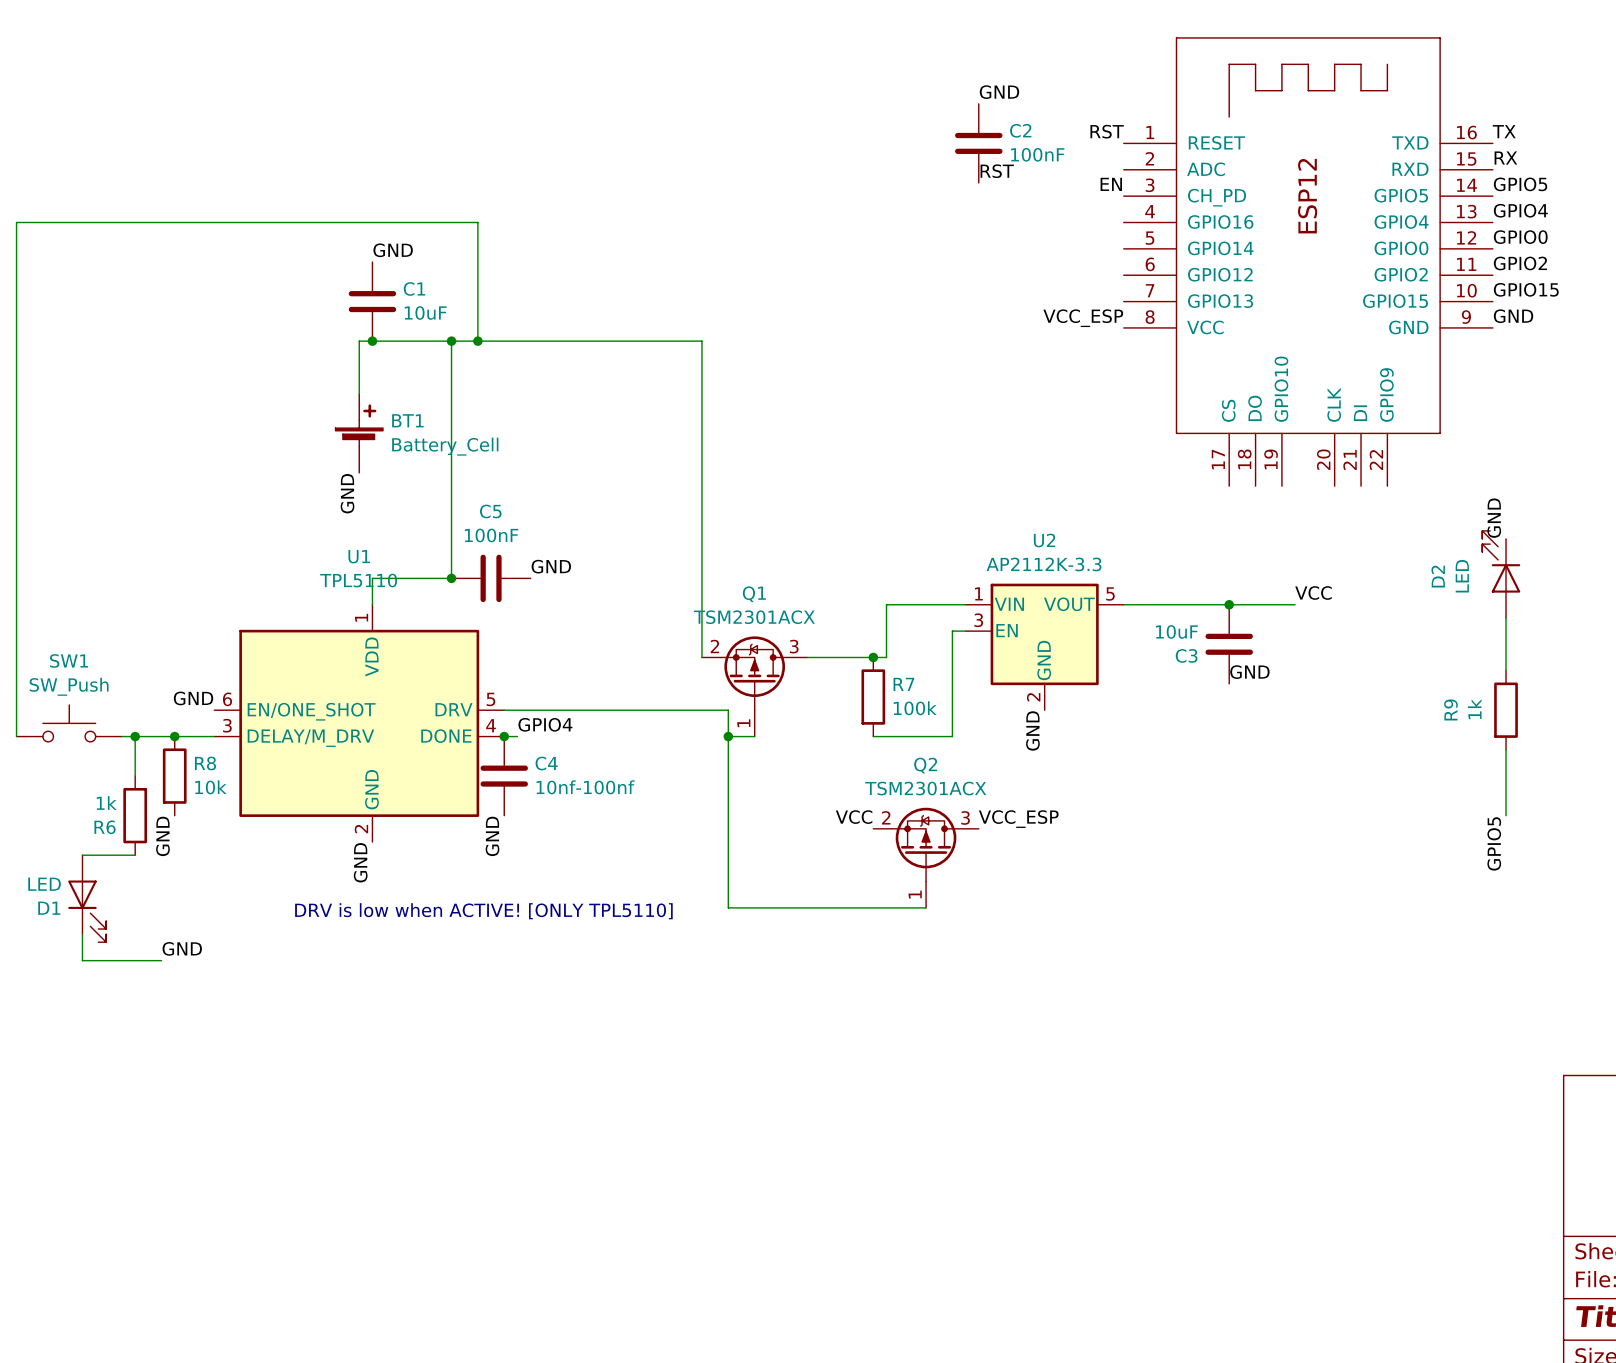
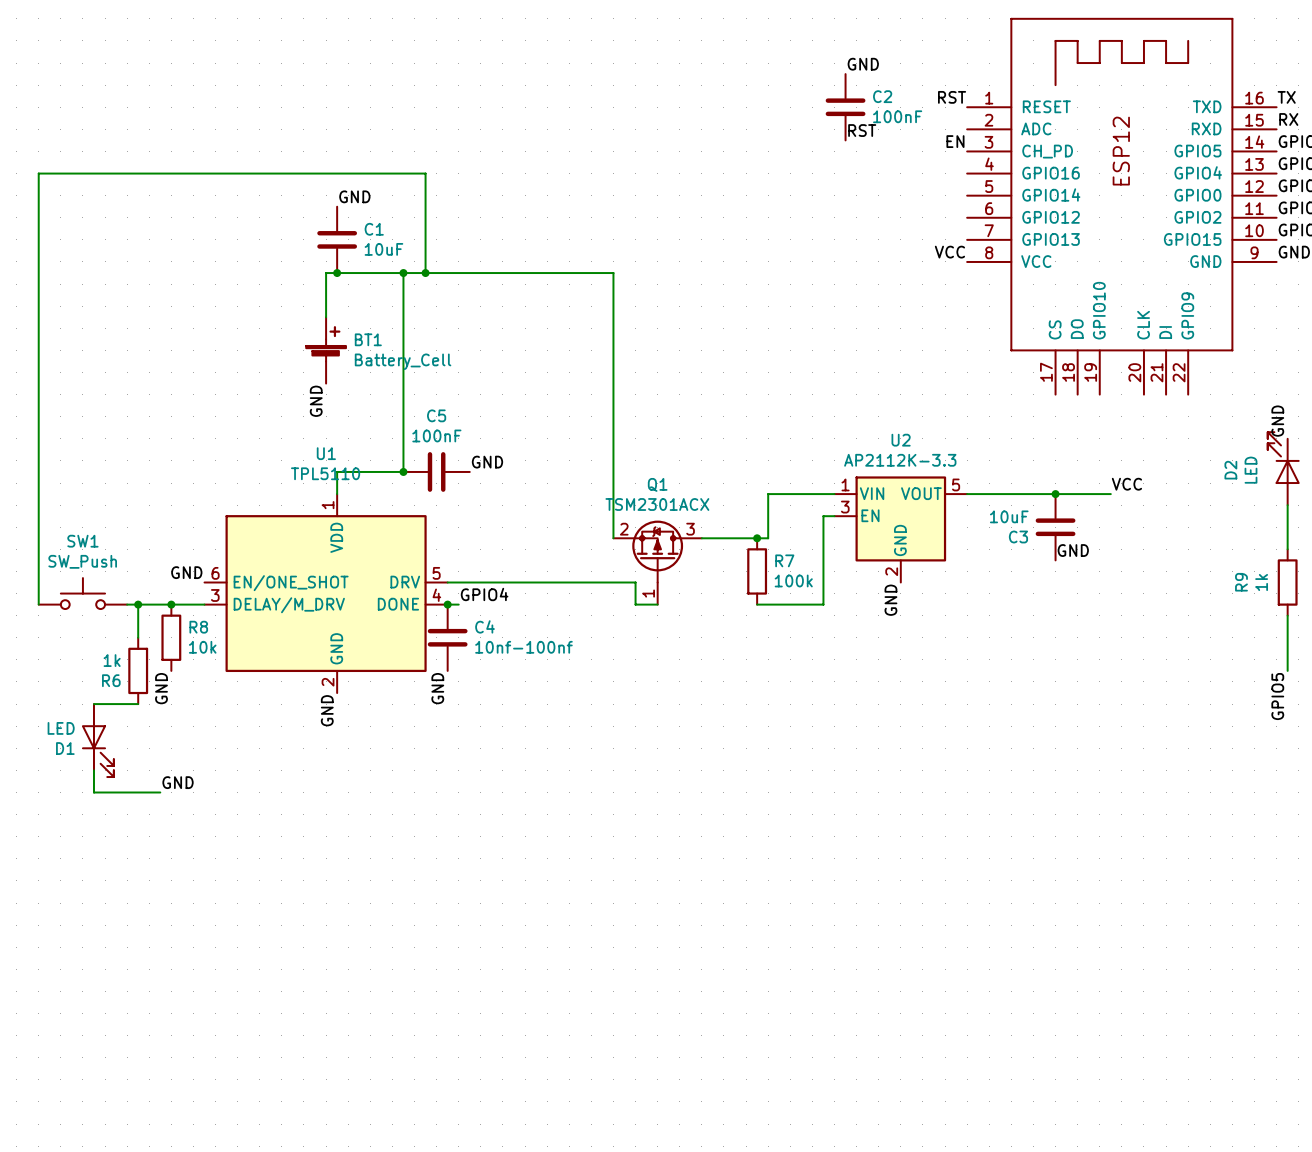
label: VCC_ESP (1083, 318) -> VCC (949, 252)
wire: (728, 736) (728, 907) (926, 907) -> none
junction: (728, 736) -> none
label: VCC (854, 817) -> none
label: VCC_ESP (1018, 819) -> none
Q2: TSM2301ACX (926, 857) -> none
text: DRV is low when ACTIVE! [ONLY TPL5110] (483, 911) -> none

